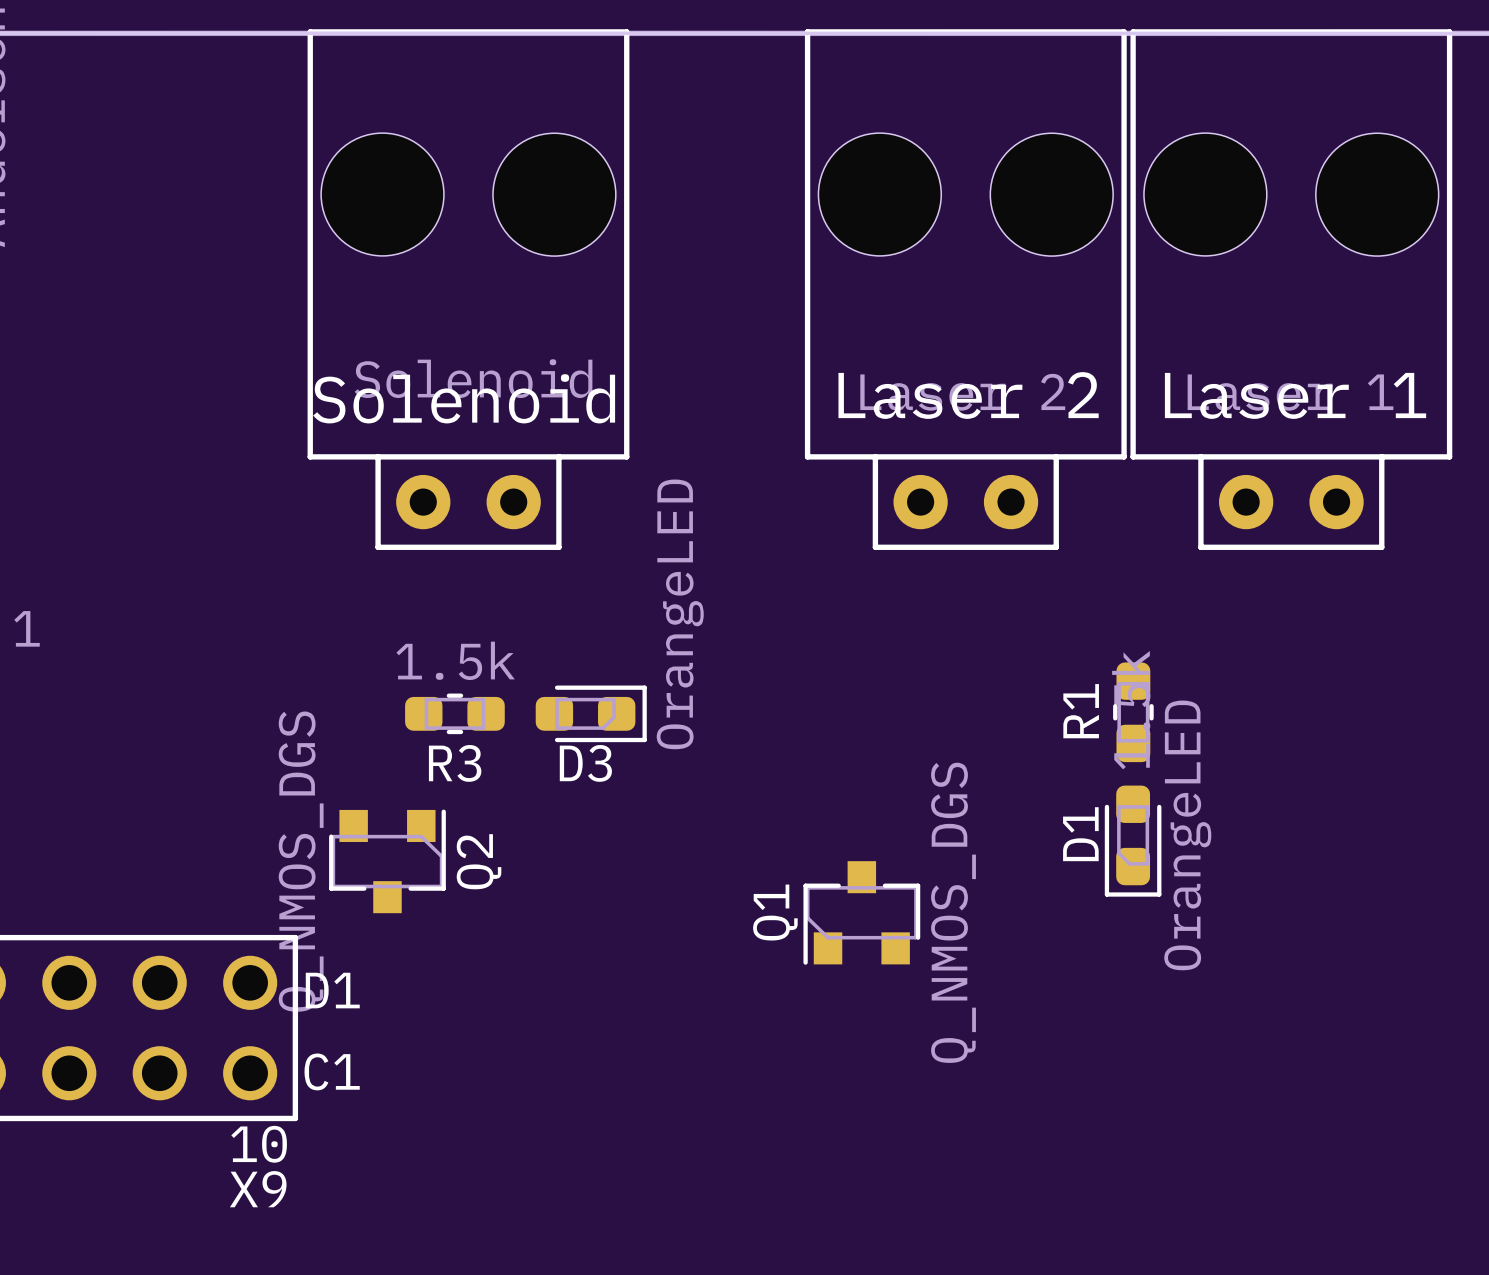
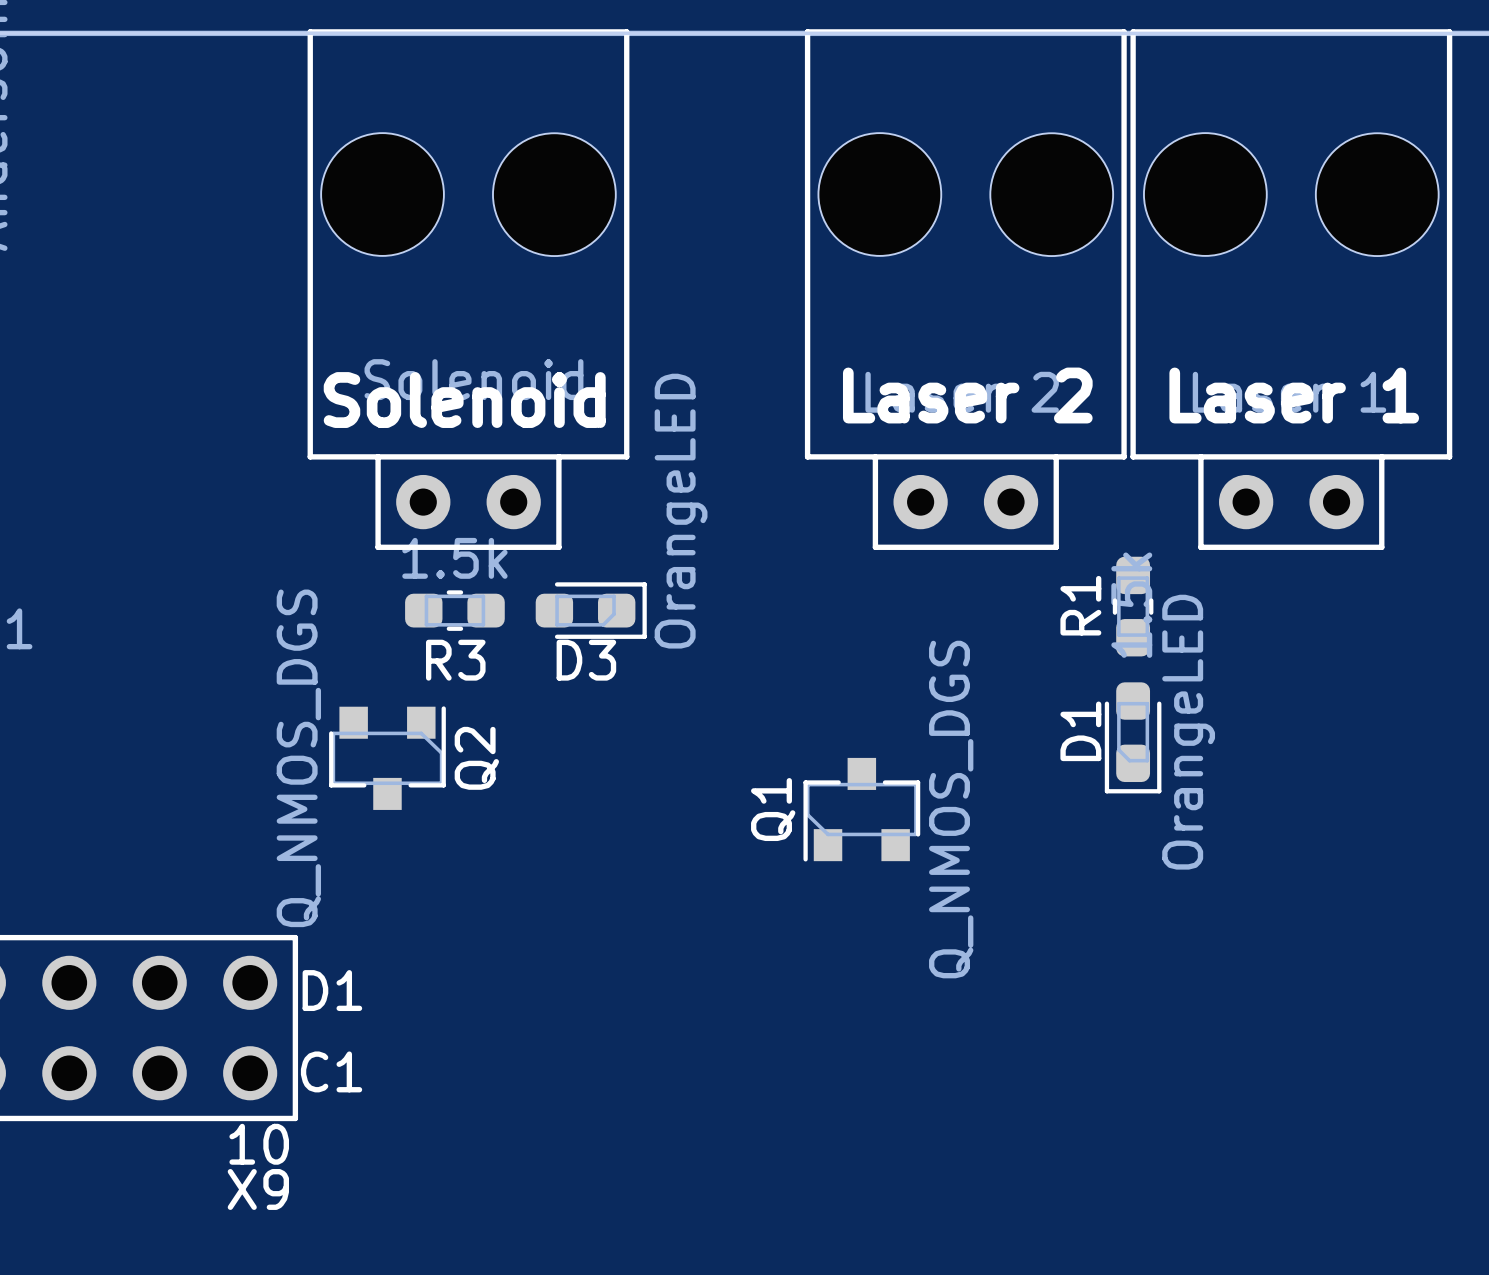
R1 position: (1133, 712) -> (1133, 606)
R3 position: (454, 713) -> (454, 610)
D3 position: (591, 713) -> (591, 610)
D1 position: (1133, 841) -> (1133, 737)
Q2 position: (387, 861) -> (387, 758)
Q1 position: (861, 912) -> (861, 809)

